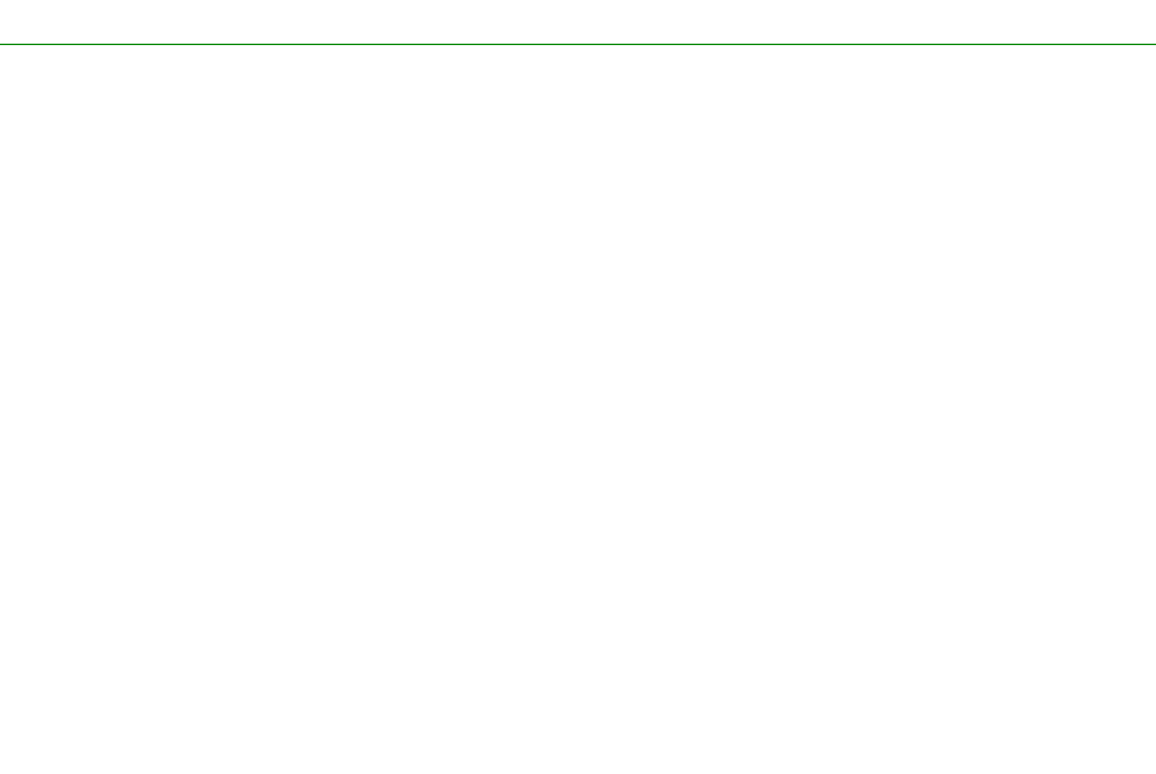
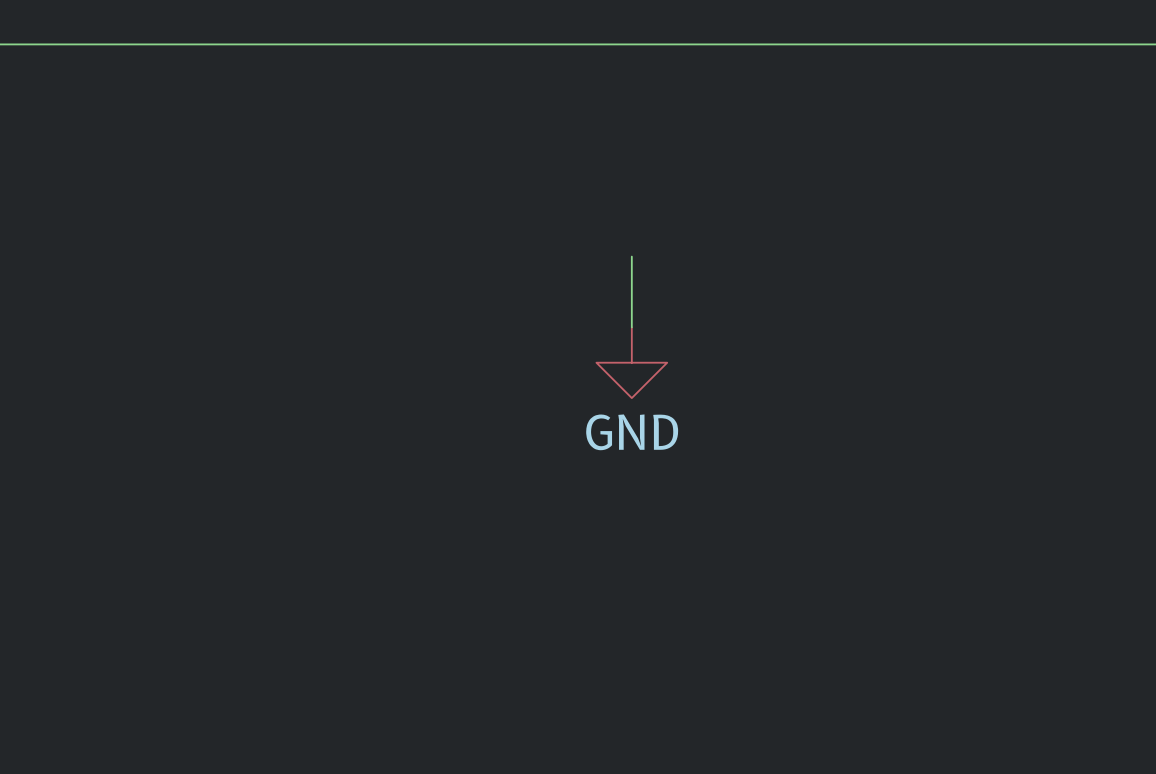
wire: none -> (631, 256) (631, 327)
power symbol: none -> GND (631, 362)

